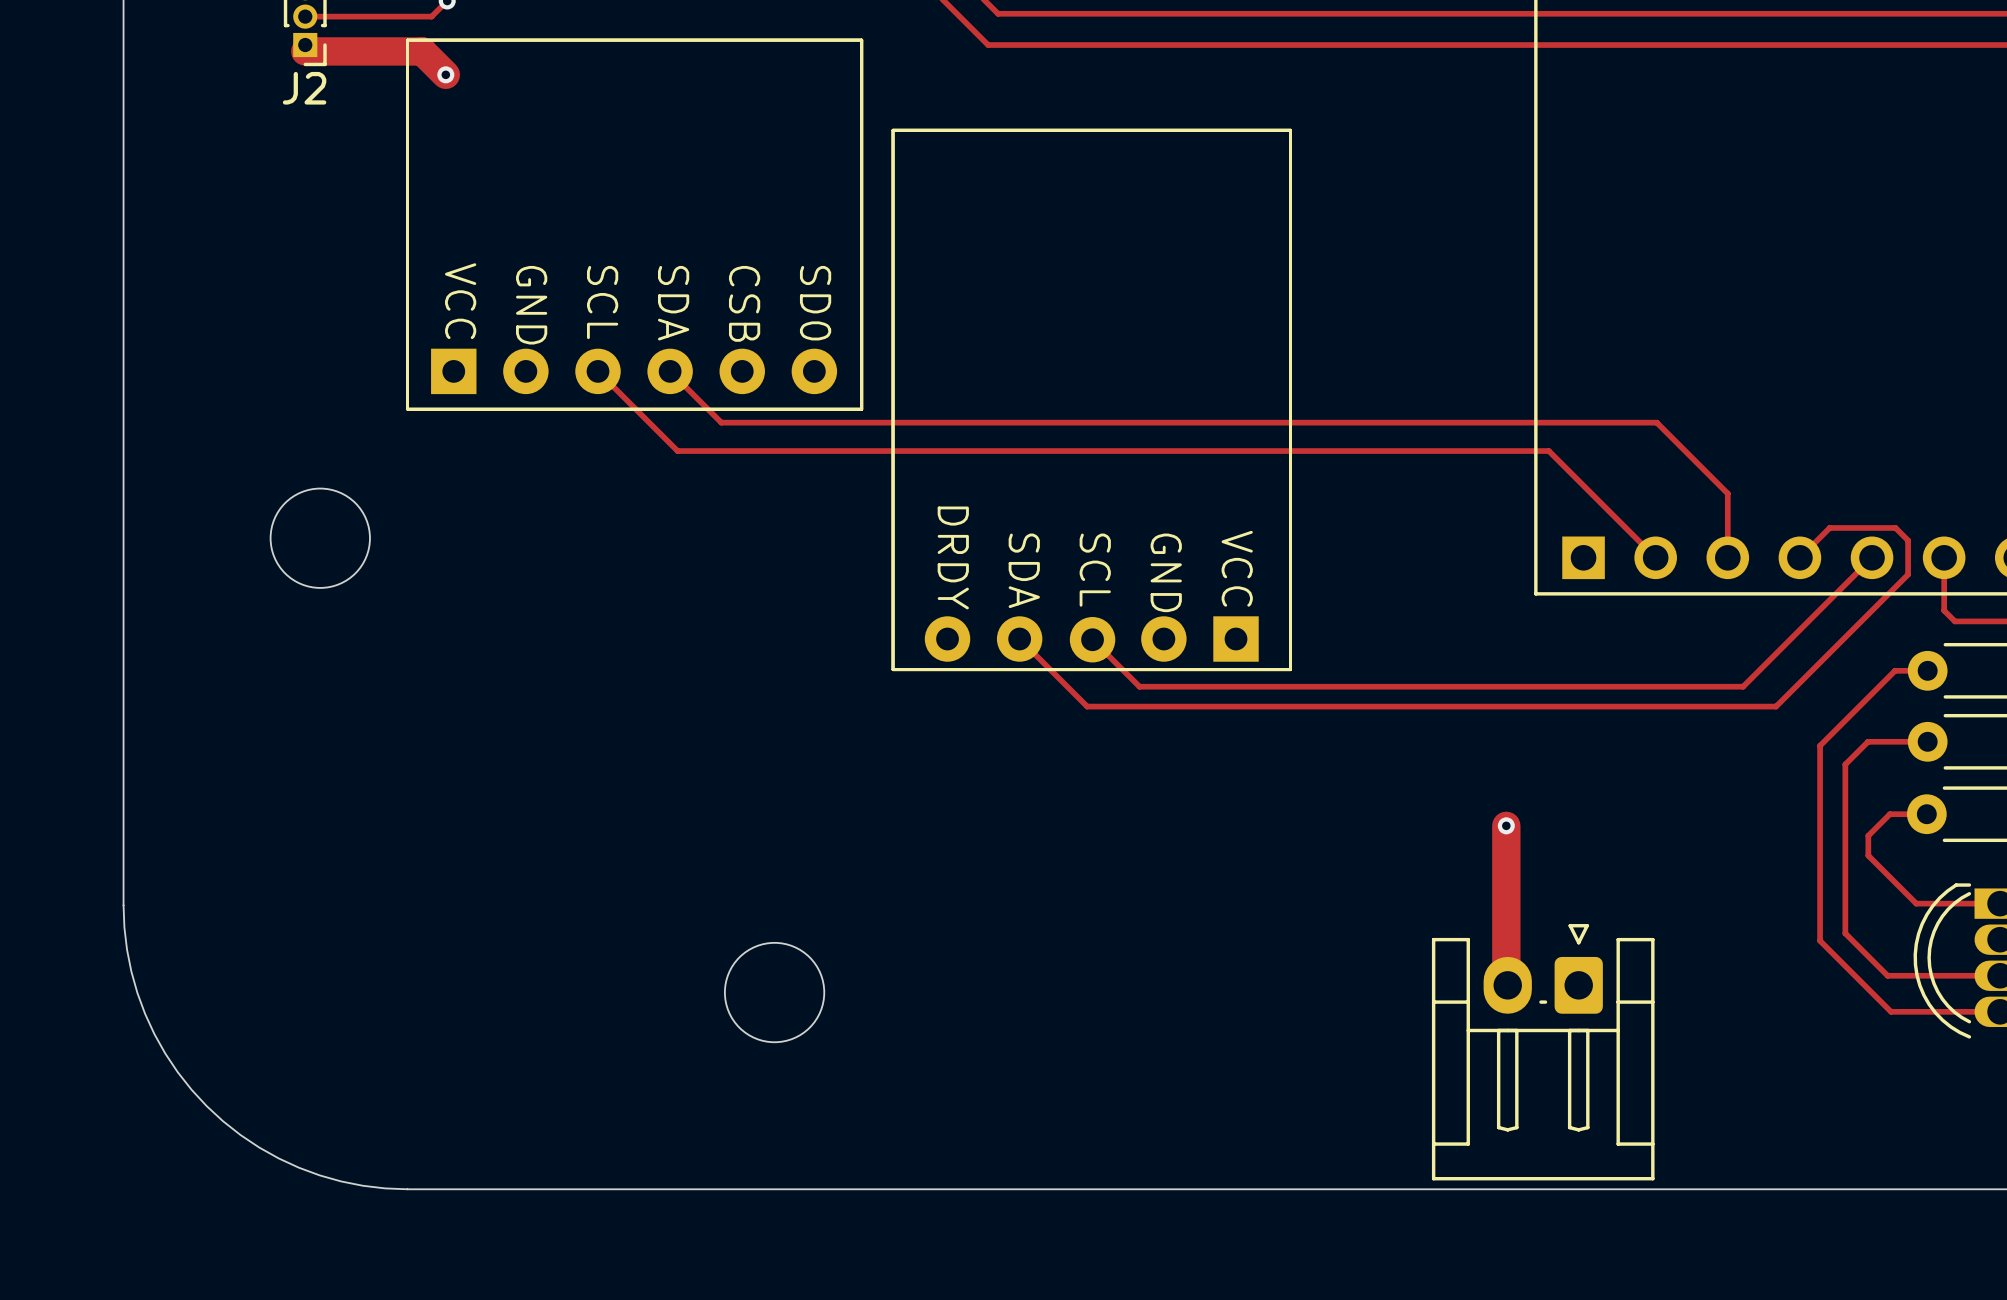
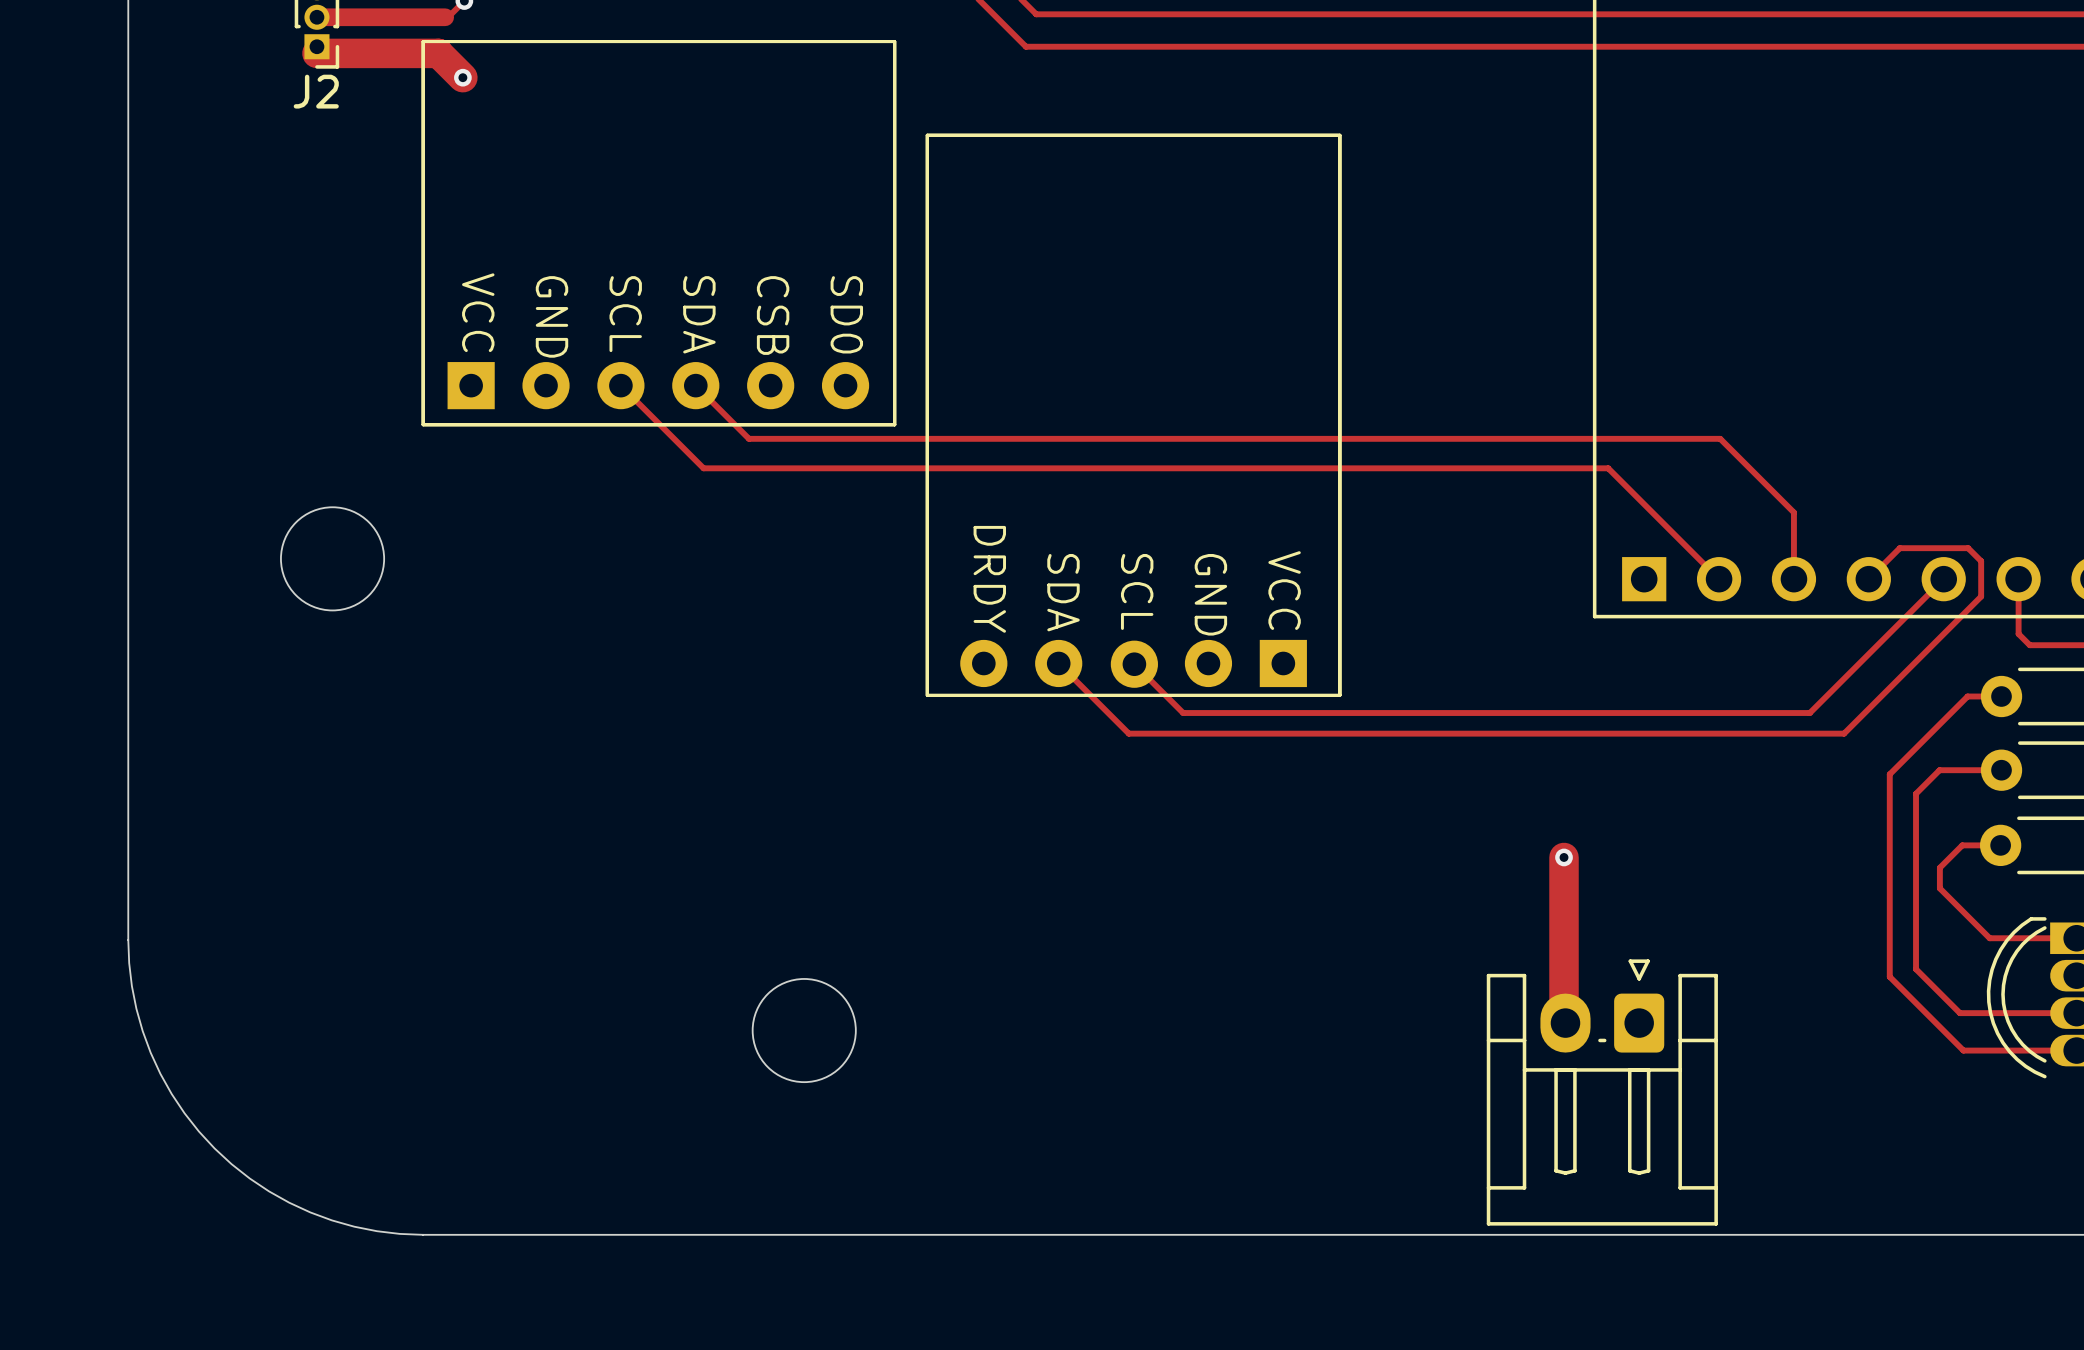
track width: thin (305, 16) (428, 16) -> thick (316, 17) (445, 17)

